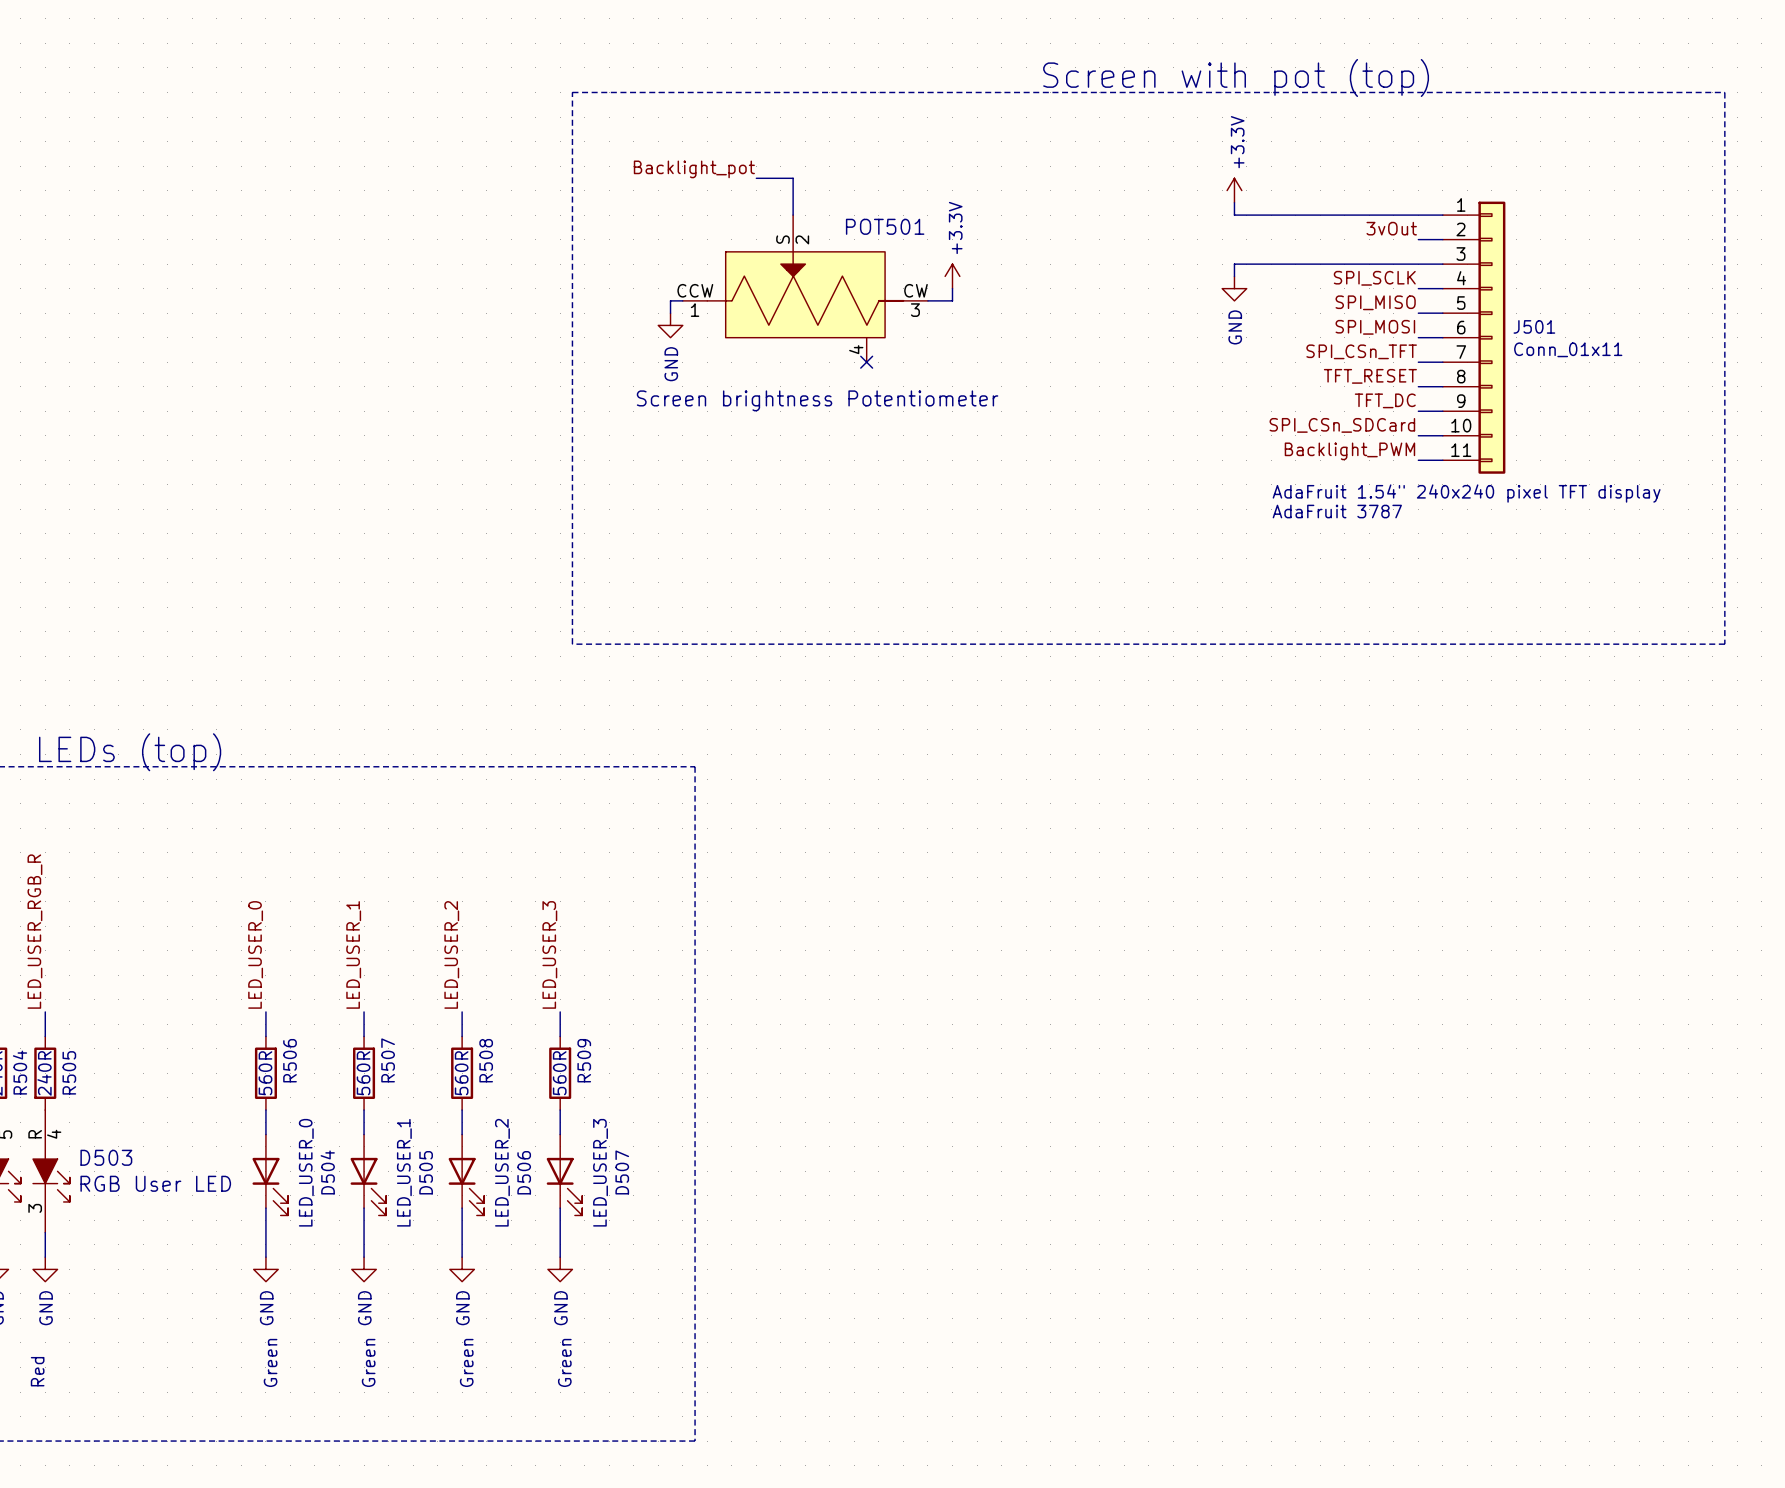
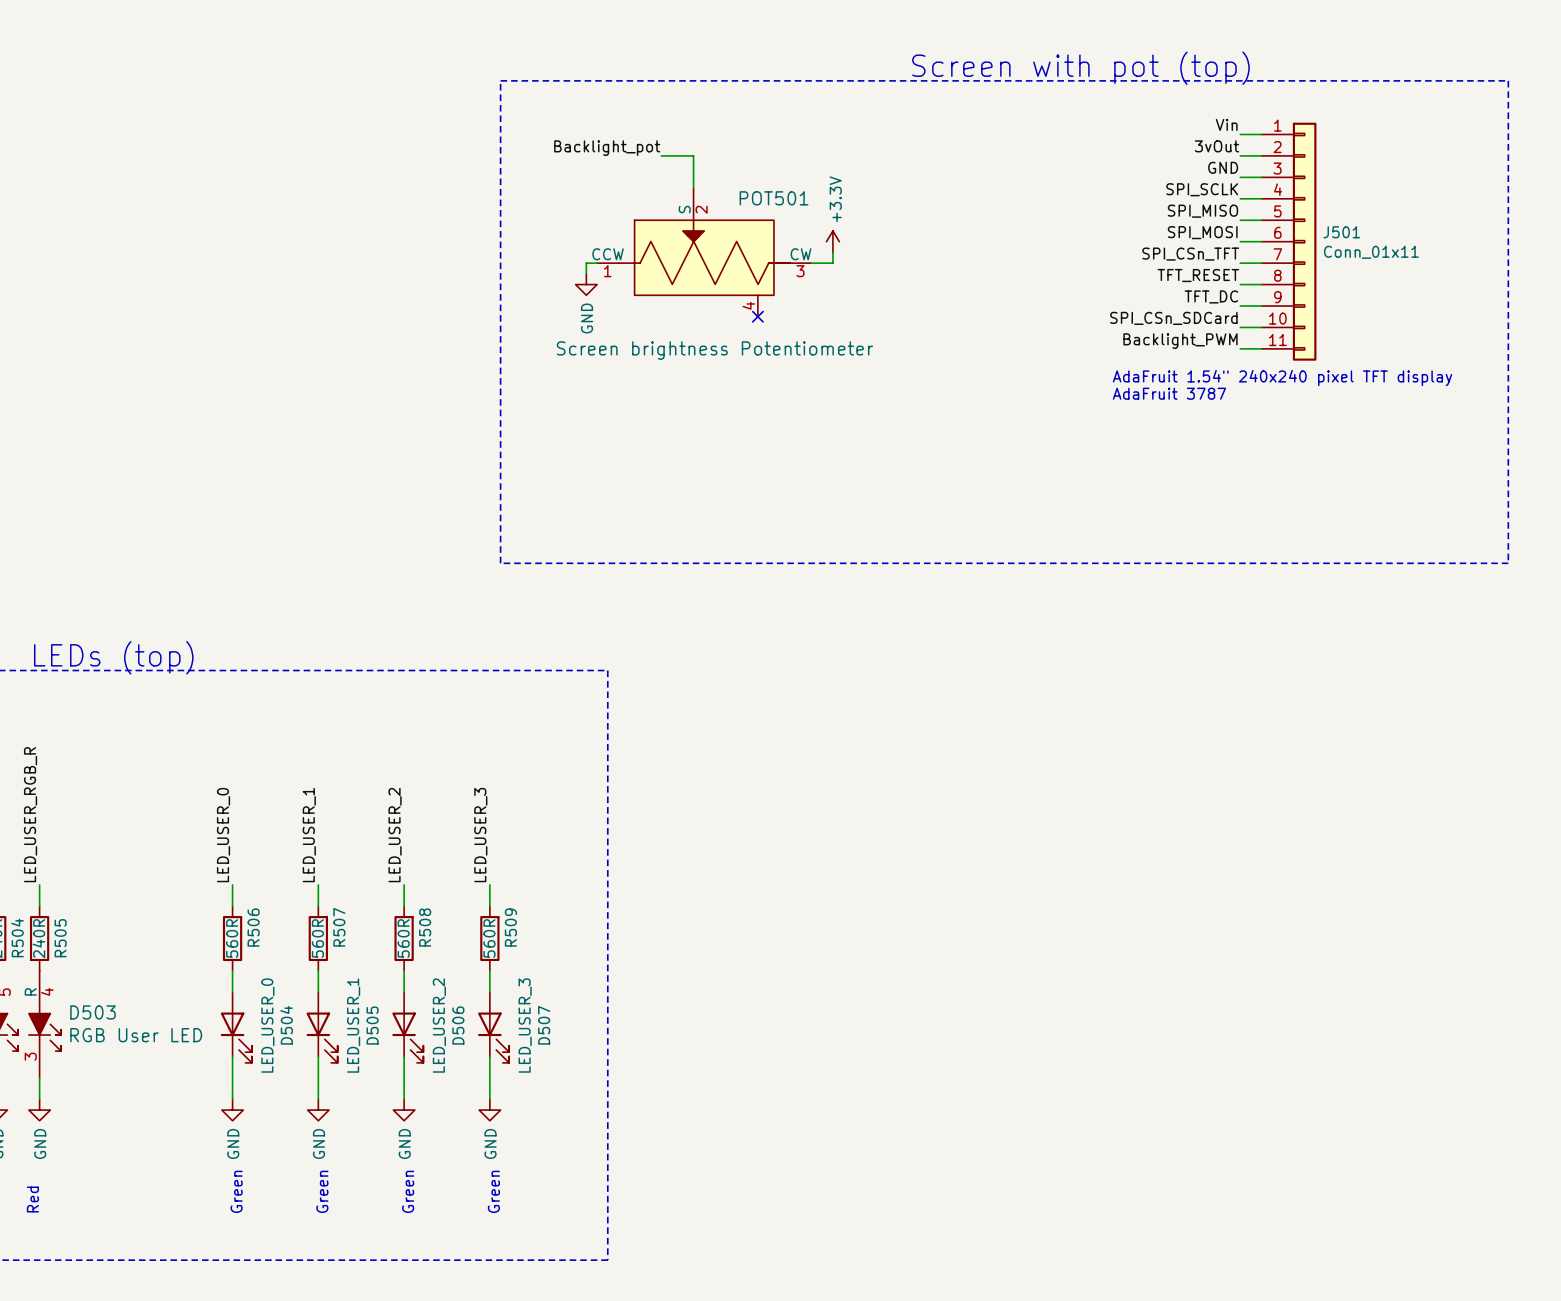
label: none -> Vin (1226, 124)
wire: none -> (1240, 134) (1261, 134)
power symbol: +3.3V (1234, 190) -> none
label: none -> GND (1223, 167)
wire: (1234, 202) (1234, 215) (1442, 215) -> none
wire: none -> (1240, 177) (1261, 177)
label position: 3vOut (1391, 228) -> 3vOut (1217, 146)
wire: (1418, 239) (1442, 239) -> (1240, 155) (1261, 155)
wire: (1442, 264) (1234, 264) (1234, 276) -> none
label position: SPI_SCLK (1374, 278) -> SPI_SCLK (1202, 189)
power symbol: GND (1234, 288) -> none
wire: (1418, 288) (1442, 288) -> (1240, 198) (1261, 198)
label position: SPI_MISO (1375, 302) -> SPI_MISO (1202, 211)
wire: (1418, 313) (1442, 313) -> (1240, 220) (1261, 220)
label position: SPI_MOSI (1375, 327) -> SPI_MOSI (1202, 232)
wire: (1418, 337) (1442, 337) -> (1240, 241) (1261, 241)
J501 position: (1474, 337) -> (1289, 241)
label position: SPI_CSn_TFT (1361, 351) -> SPI_CSn_TFT (1190, 254)
wire: (1418, 362) (1442, 362) -> (1240, 263) (1261, 263)
label position: TFT_RESET (1370, 376) -> TFT_RESET (1198, 275)
wire: (1418, 386) (1442, 386) -> (1240, 284) (1261, 284)
label position: TFT_DC (1385, 400) -> TFT_DC (1211, 296)
wire: (1418, 411) (1442, 411) -> (1240, 306) (1261, 306)
label position: SPI_CSn_SDCard (1342, 425) -> SPI_CSn_SDCard (1173, 318)
wire: (1418, 435) (1442, 435) -> (1240, 327) (1261, 327)
label position: Backlight_PWM (1349, 451) -> Backlight_PWM (1180, 341)
wire: (1418, 460) (1442, 460) -> (1240, 348) (1261, 348)
text position: AdaFruit 1.54" 240x240 pixel TFT display (1466, 493) -> AdaFruit 1.54" 240x240 pixel TFT display (1282, 377)
text position: AdaFruit 3787 (1337, 511) -> AdaFruit 3787 (1169, 393)

